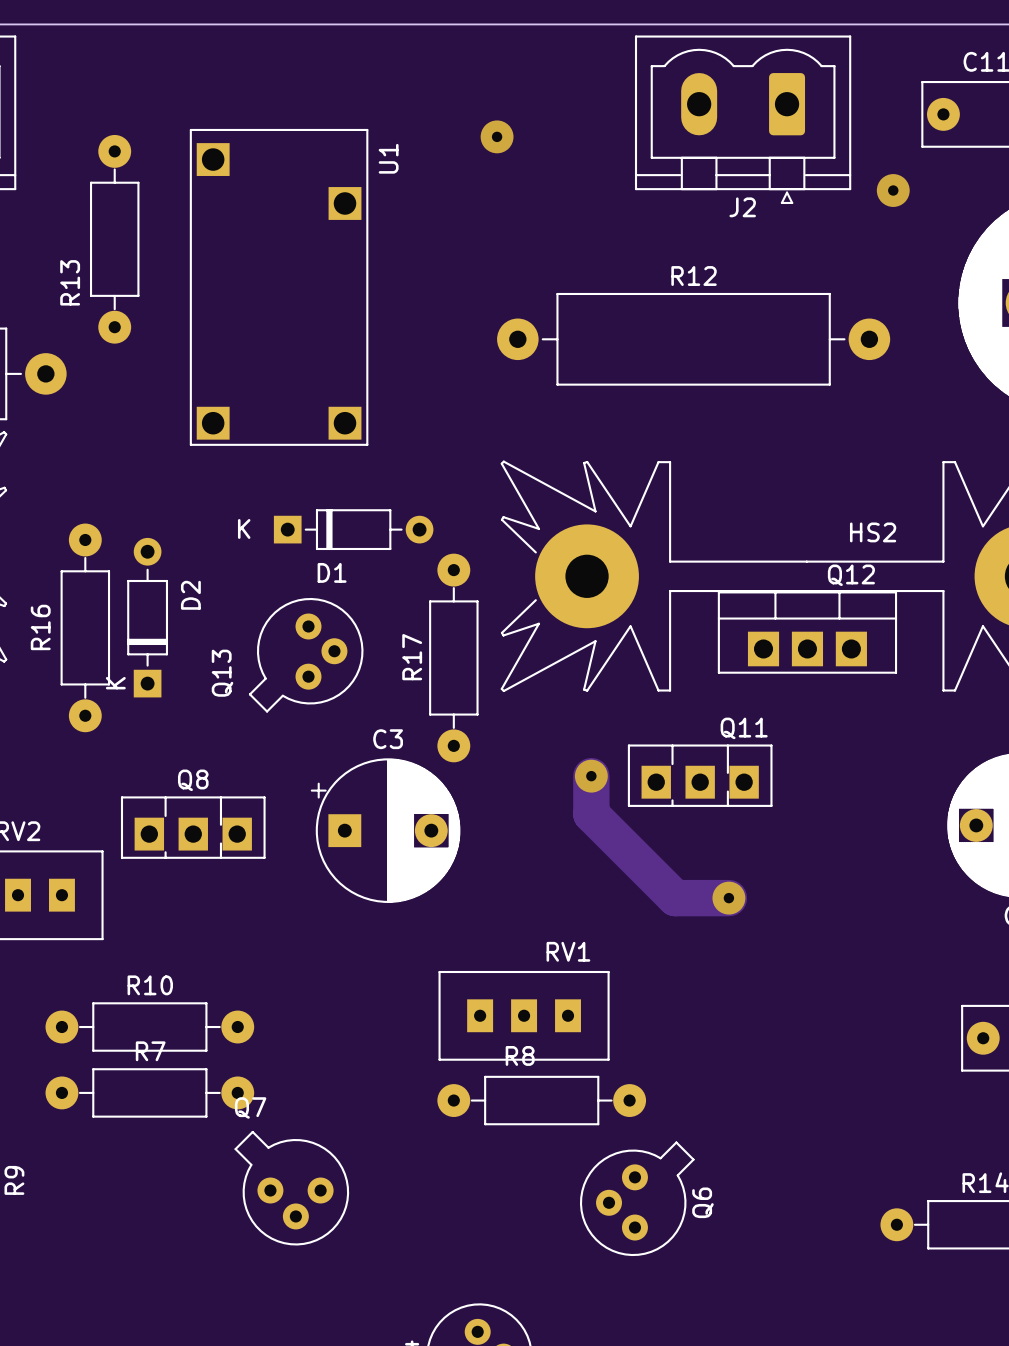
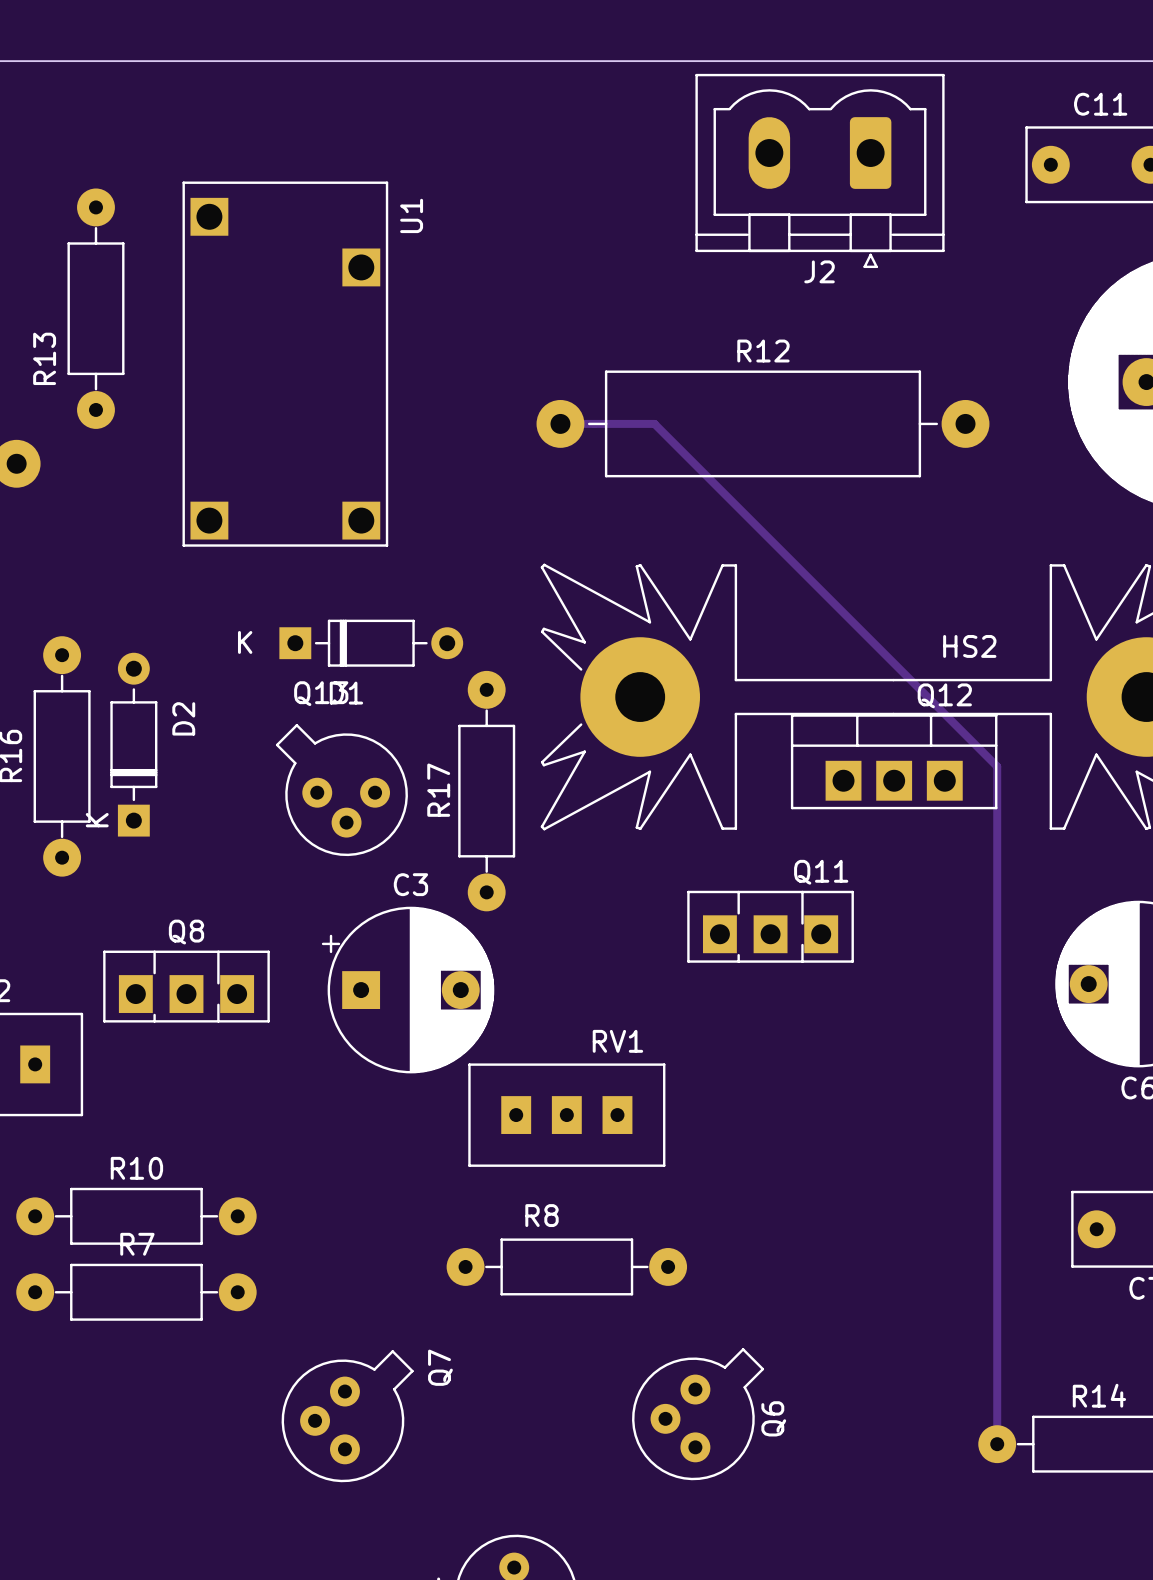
via: (497, 136) -> none
via: (893, 190) -> none
track: none -> (560, 423) (654, 423) (997, 766) (997, 1444)
Q13 rotation: 0° (306, 655) -> 90° clockwise (341, 790)
track: (591, 776) (591, 814) (675, 898) (728, 898) -> none
via: (591, 776) -> none
via: (728, 898) -> none
RV1 position: (524, 1015) -> (566, 1115)
R8 position: (541, 1100) -> (566, 1266)
Q7 rotation: 0° (291, 1188) -> 90° clockwise (347, 1416)

